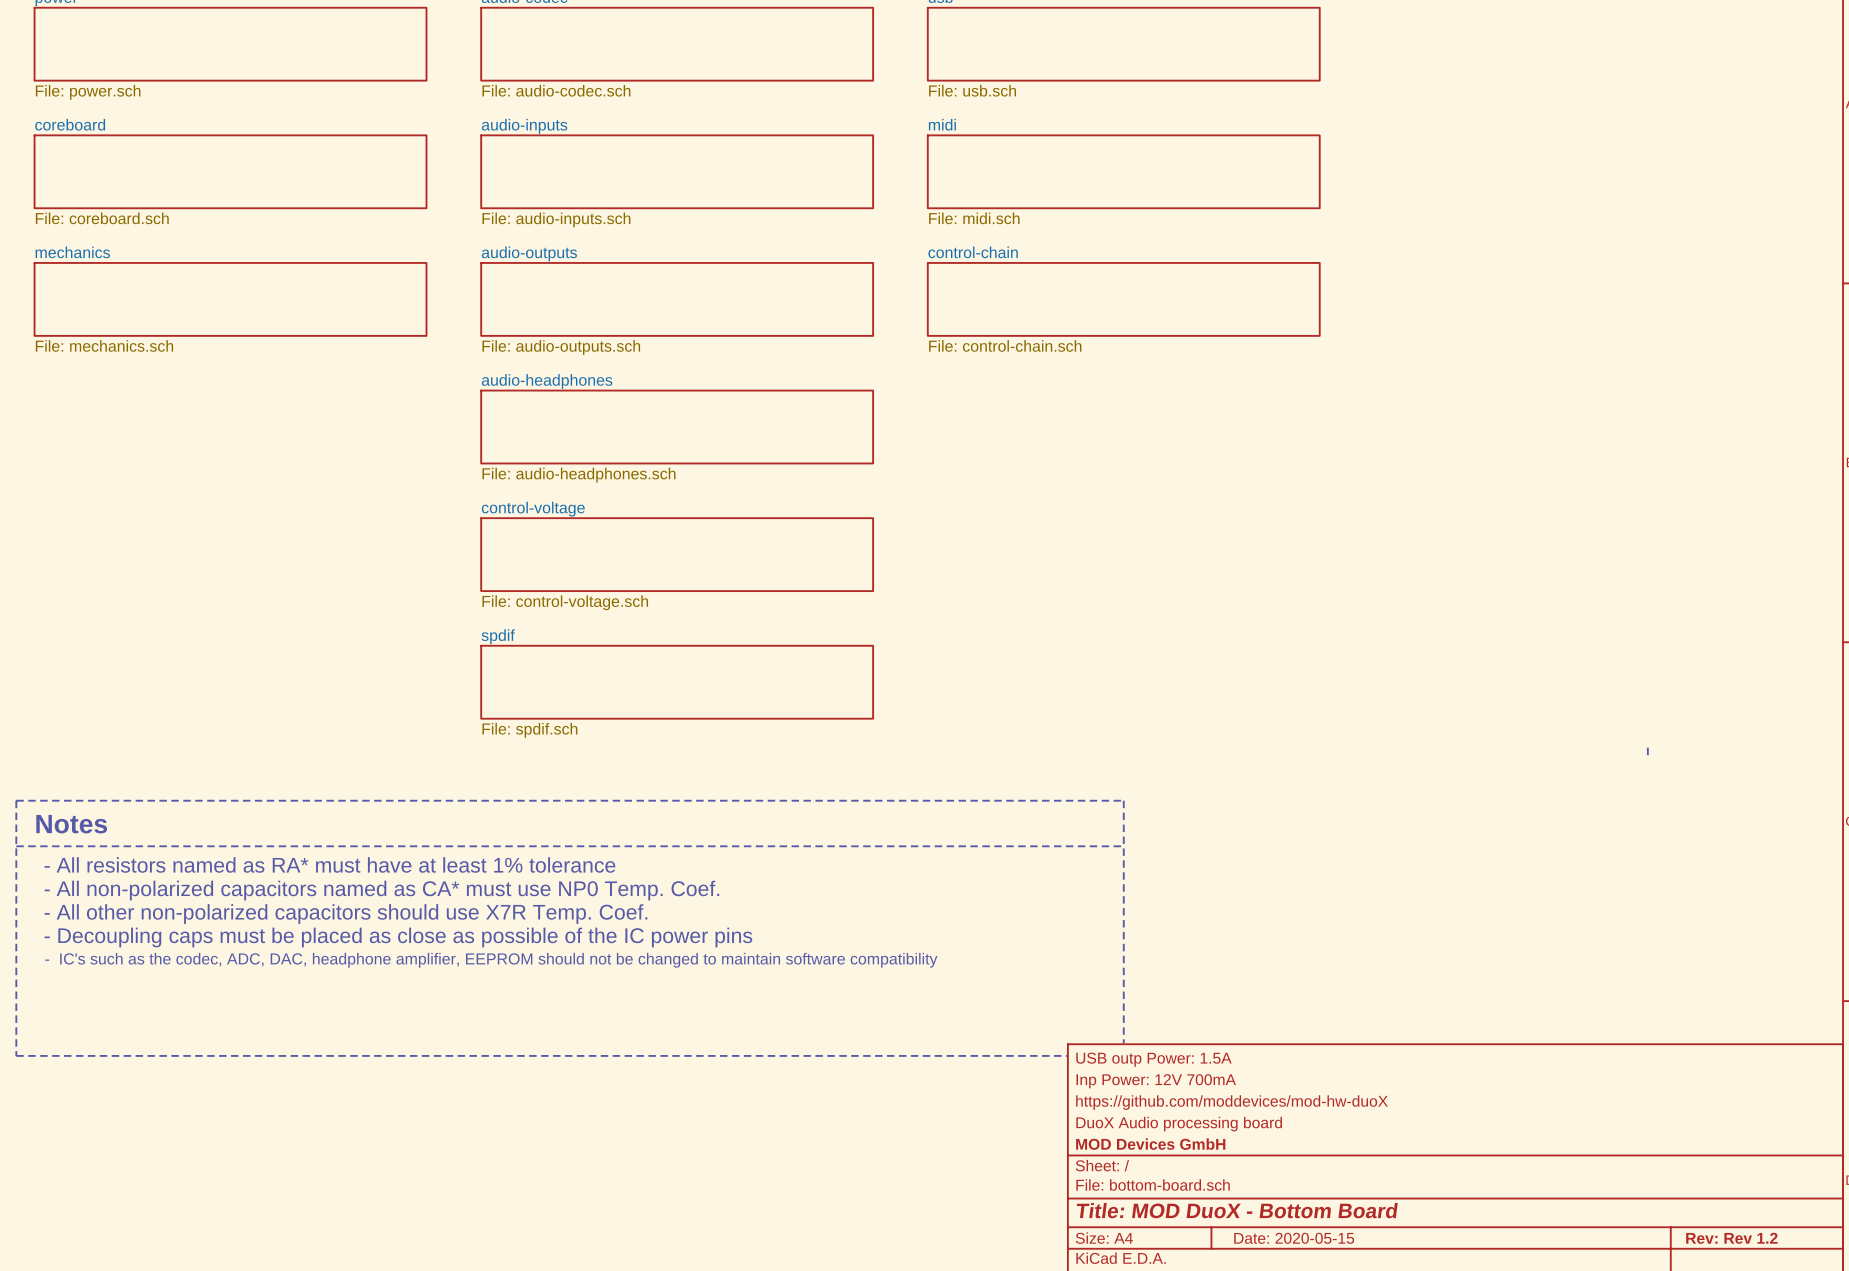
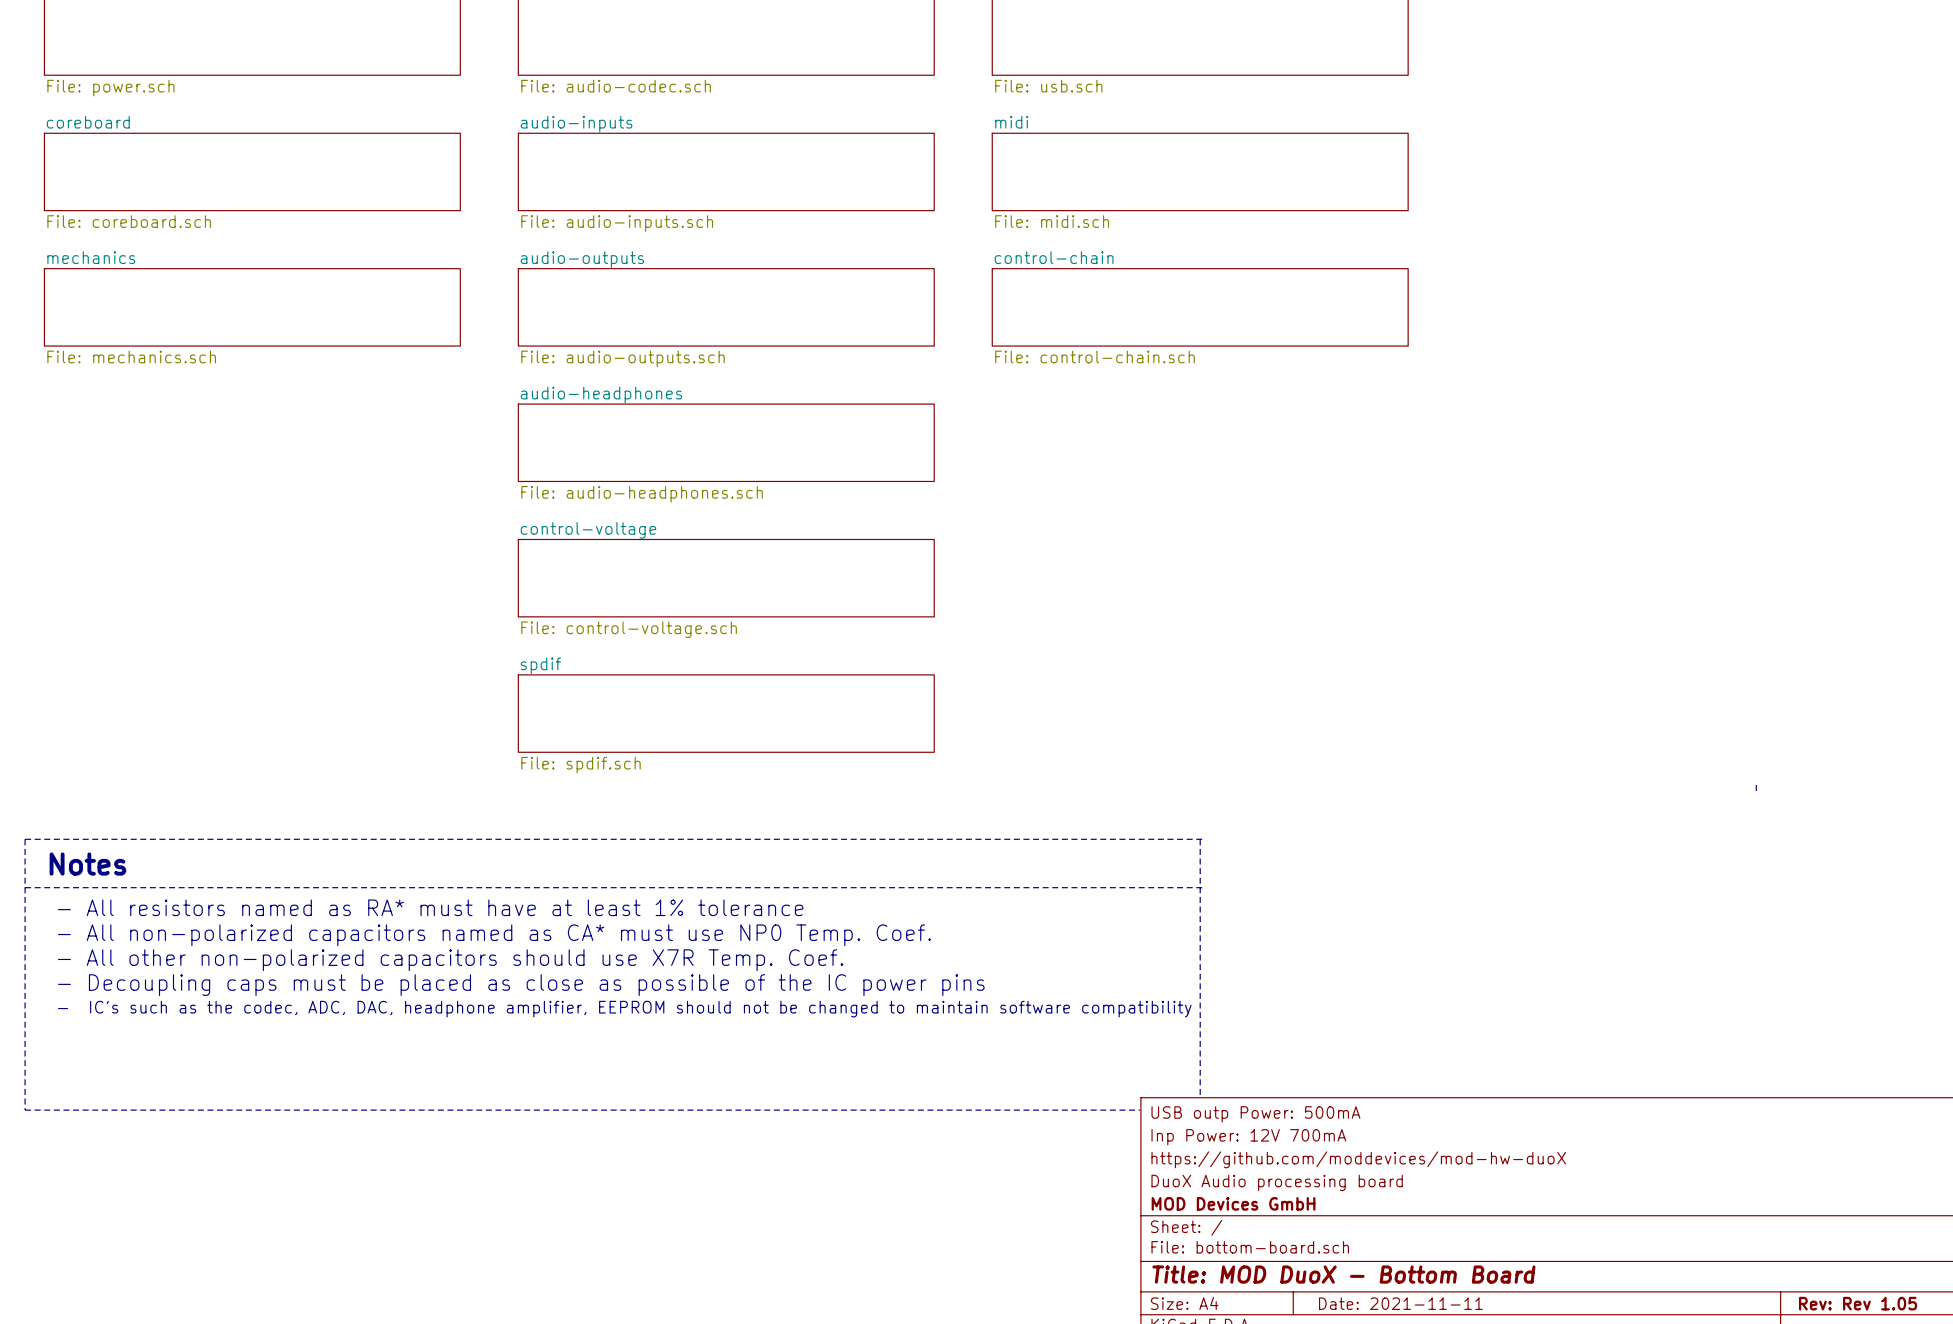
title block: USB outp Power: 1.5A (1153, 1059) -> USB outp Power: 500mA (1255, 1114)
title block: Date: 2020-05-15 (1294, 1238) -> Date: 2021-11-11 (1400, 1303)
title block: Rev: Rev 1.2 (1731, 1238) -> Rev: Rev 1.05 (1858, 1303)

